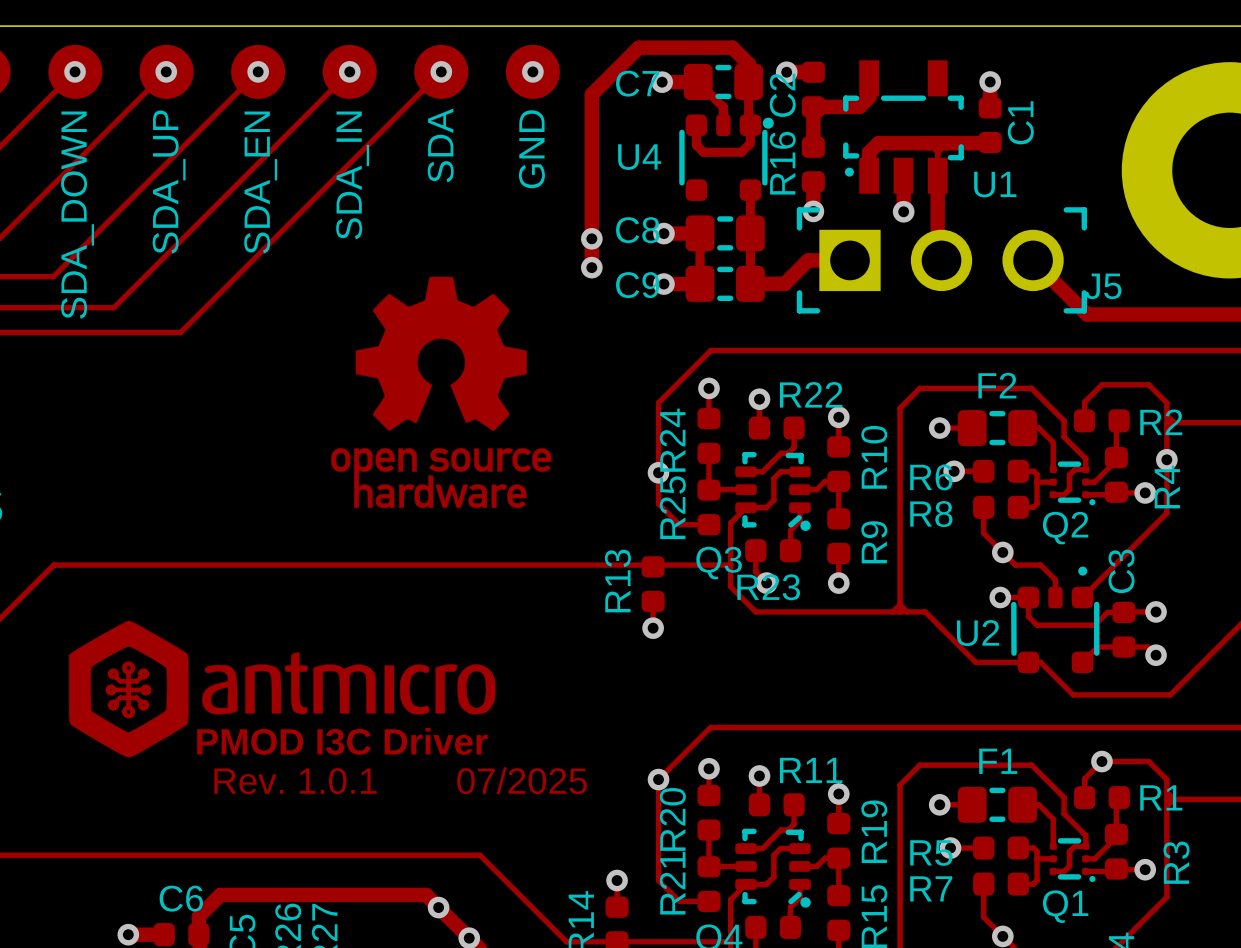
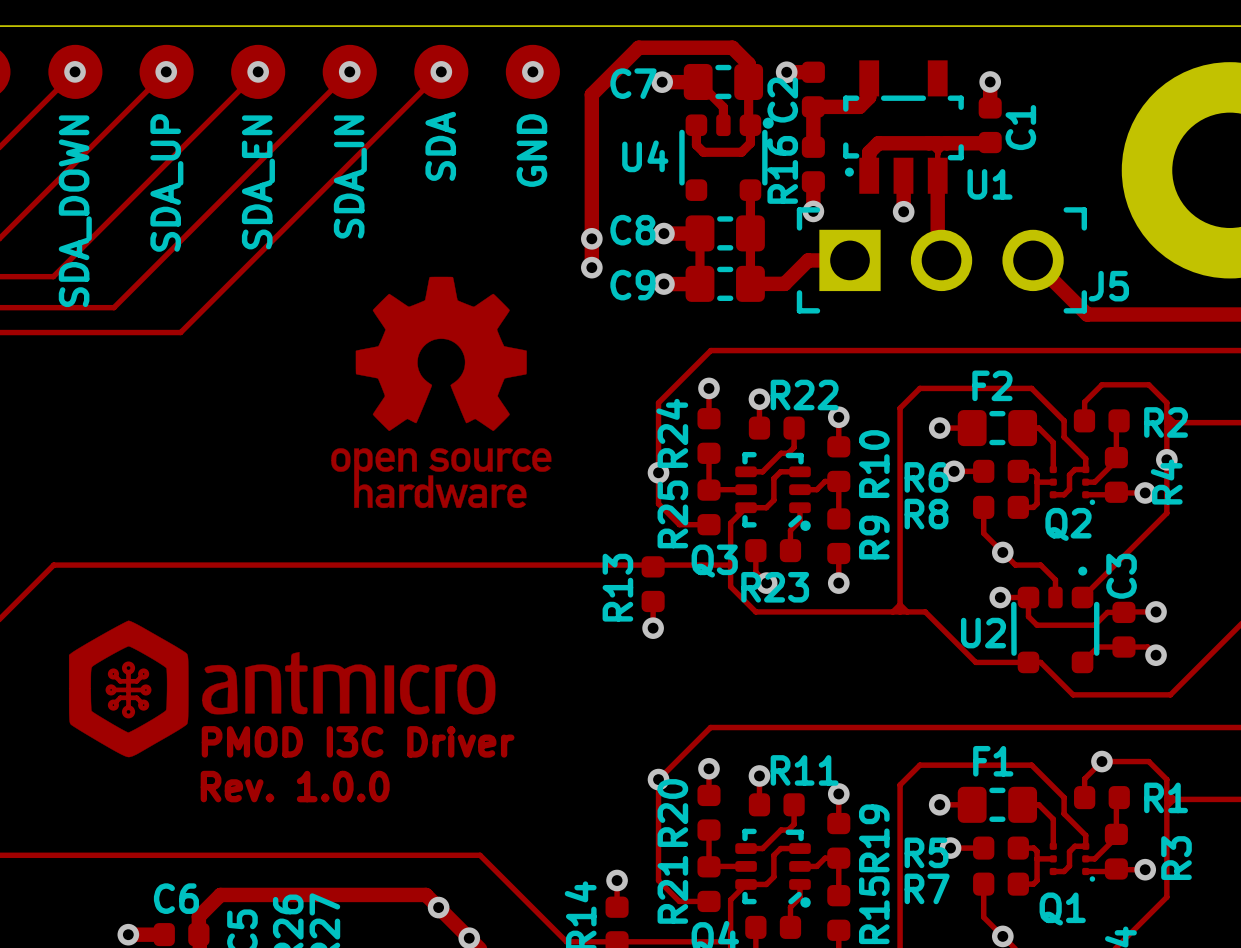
Q2 footprint: [1049, 461, 1096, 506] -> [1049, 465, 1096, 505]
text: 07/2025 (522, 780) -> none
text: Rev. 1.0.1 (295, 781) -> Rev. 1.0.0 (295, 786)
Q1 footprint: [1049, 838, 1096, 883] -> [1049, 842, 1096, 882]

